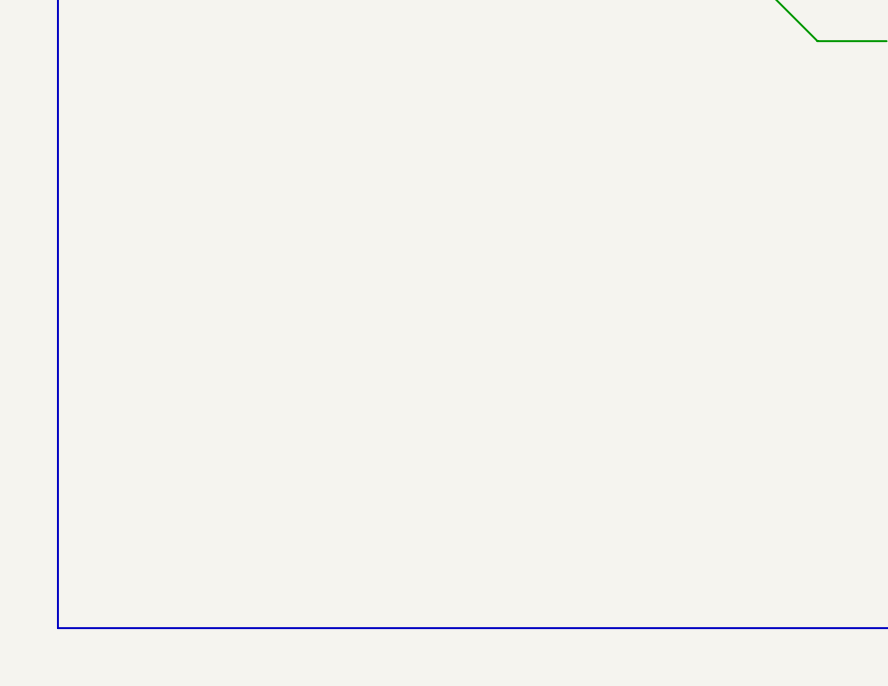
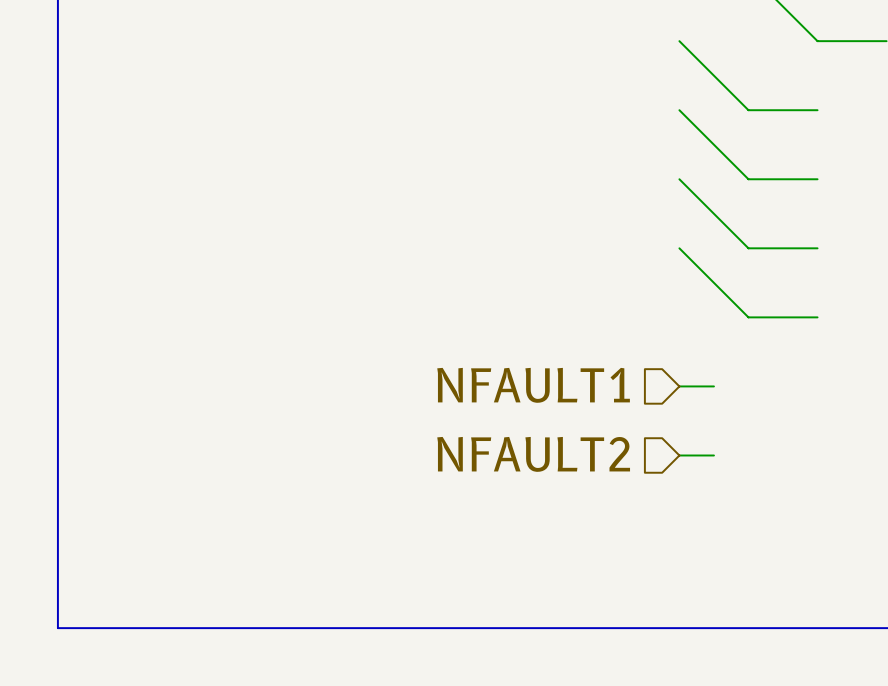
wire: none -> (679, 41) (748, 110) (817, 110)
wire: none -> (679, 110) (748, 179) (817, 179)
wire: none -> (679, 179) (748, 248) (817, 248)
wire: none -> (679, 248) (748, 317) (817, 317)
hierarchical label: none -> NFAULT1 (533, 385)
wire: none -> (679, 386) (713, 386)
hierarchical label: none -> NFAULT2 (533, 454)
wire: none -> (679, 455) (713, 455)

